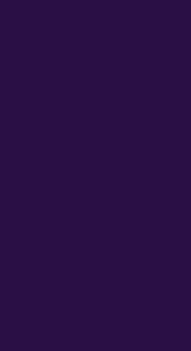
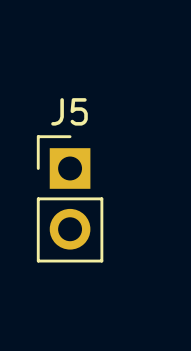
J5: none -> (70, 198)

